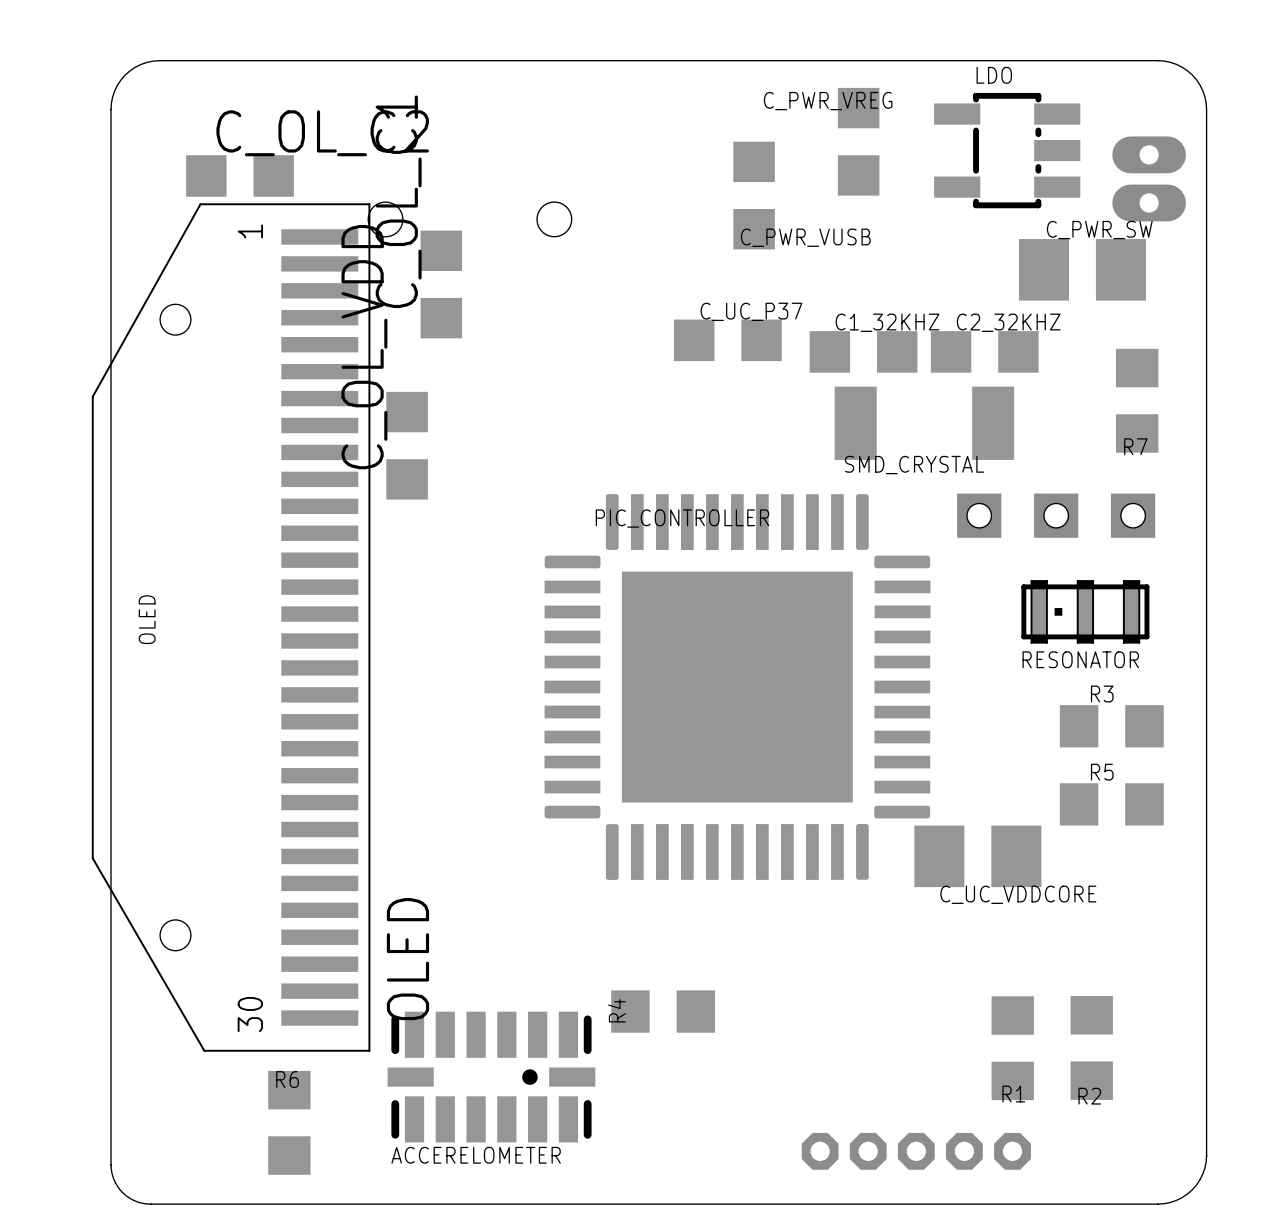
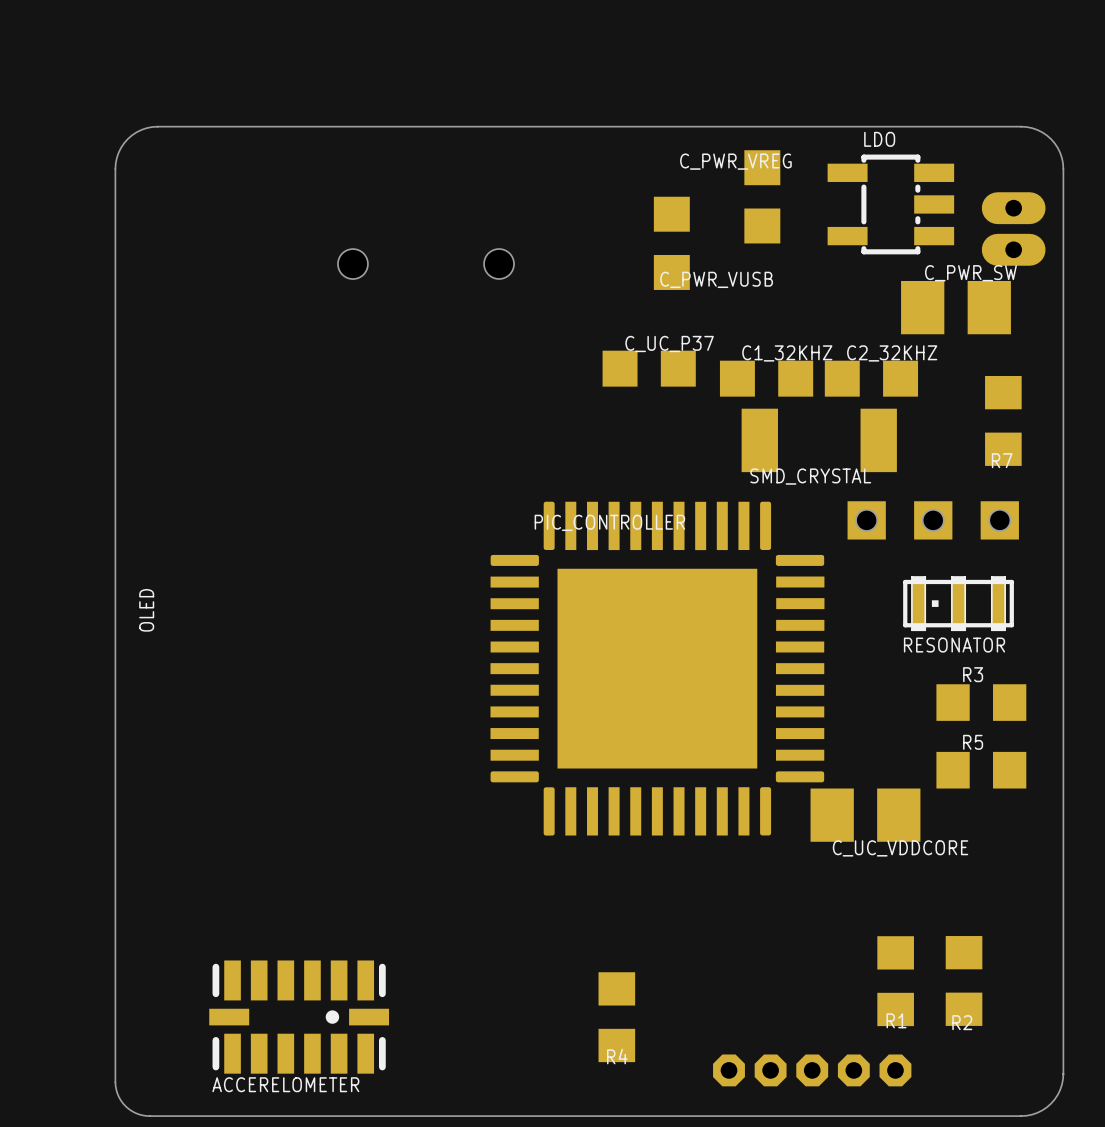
C_OL_C2: (240, 175) -> none
C_OL_C1: (441, 284) -> none
C_OL_VDD: (407, 445) -> none
OLED: (231, 627) -> none
R4 rotation: 0° (663, 1011) -> 90° clockwise (616, 1017)
R4 position: (663, 1011) -> (616, 1017)
ACCERELOMETER position: (491, 1077) -> (299, 1017)
R6: (289, 1122) -> none

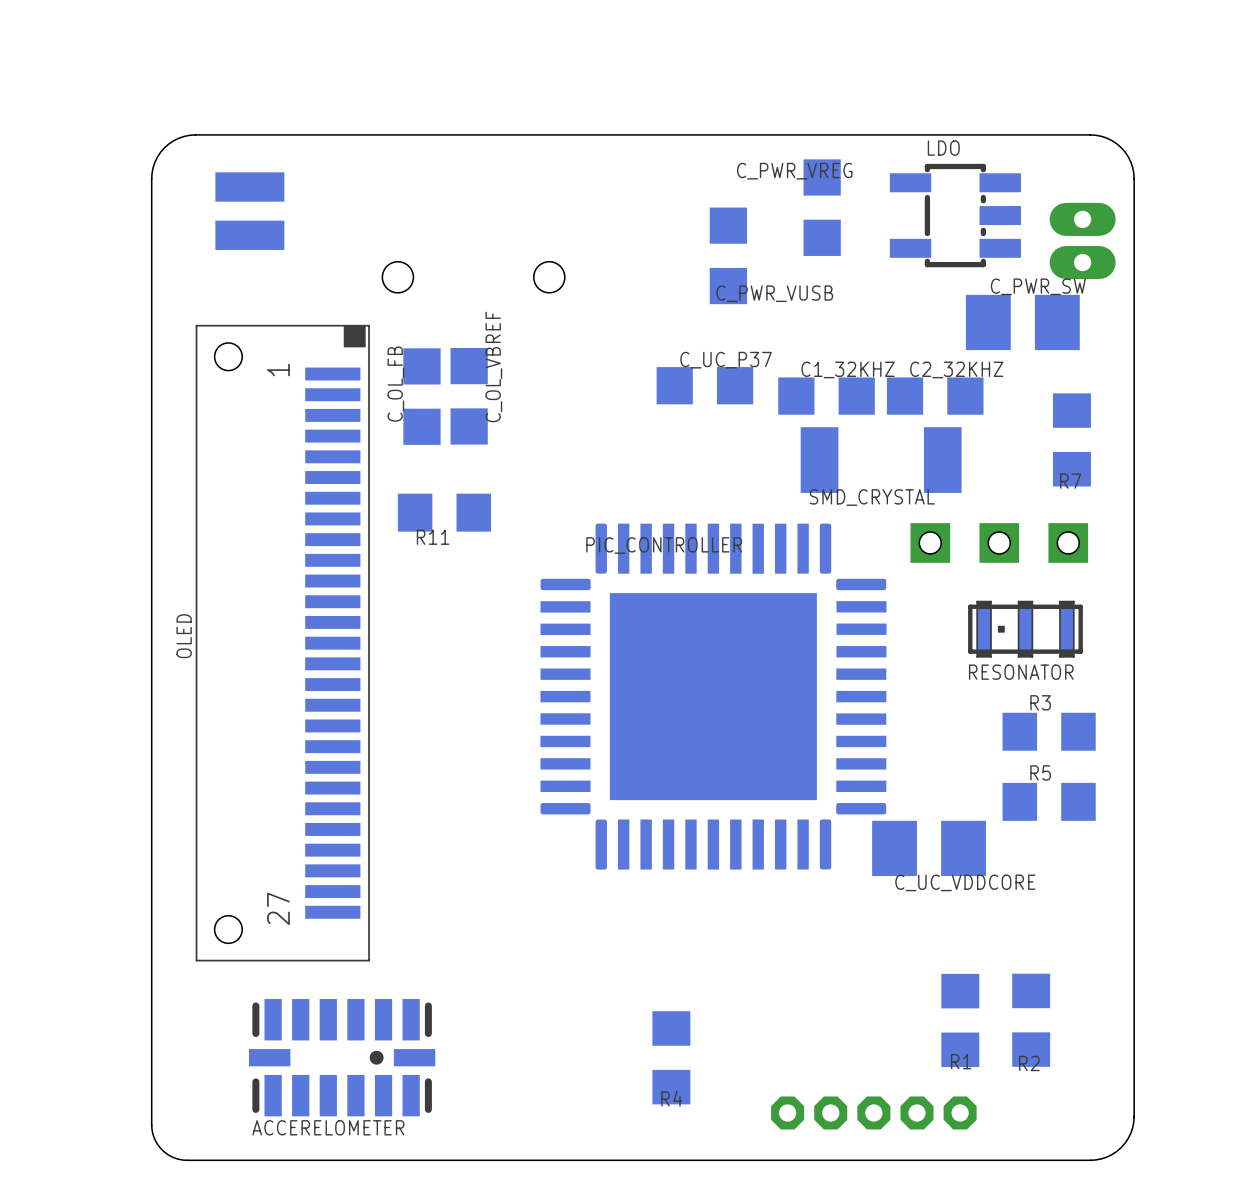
part: none -> (249, 211)
C_OL_VBREF: none -> (469, 396)
C_OL_FB: none -> (421, 396)
R11: none -> (444, 512)
part: none -> (282, 643)

